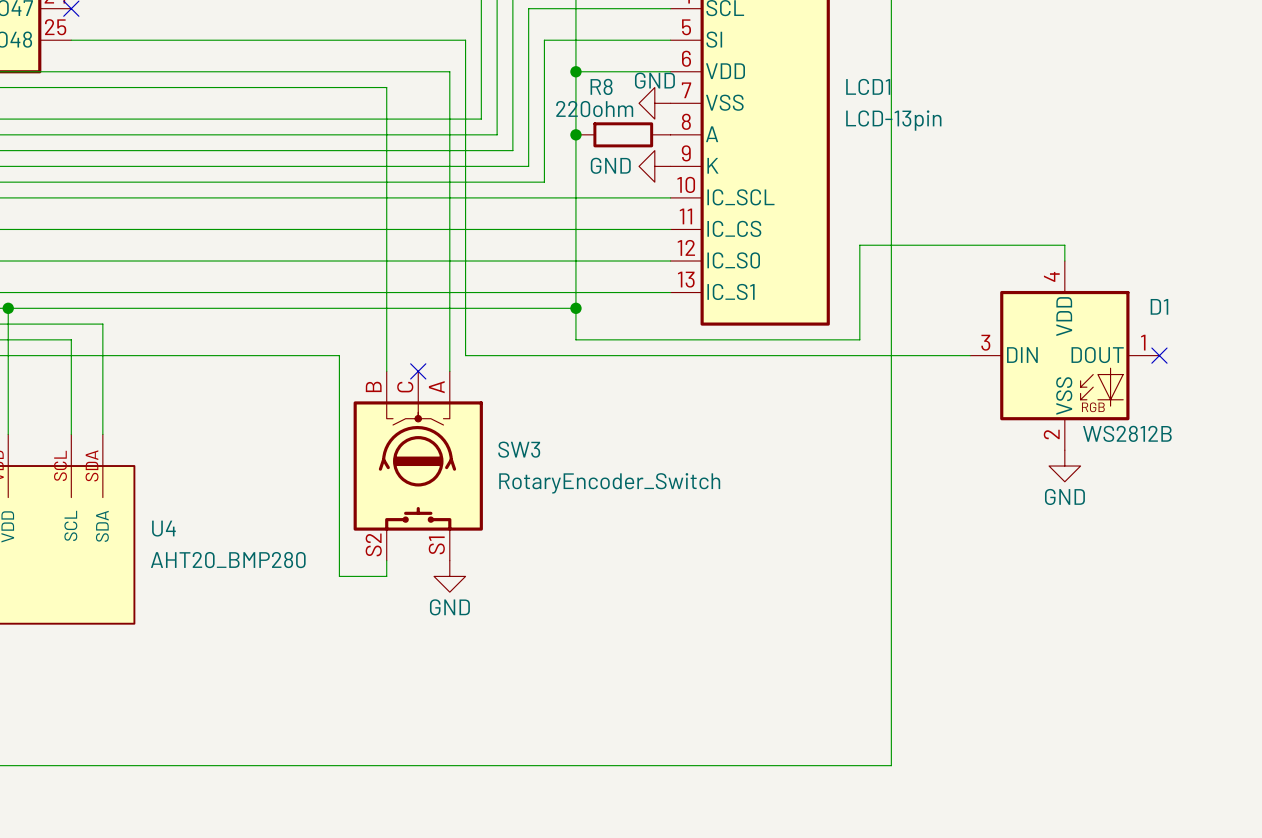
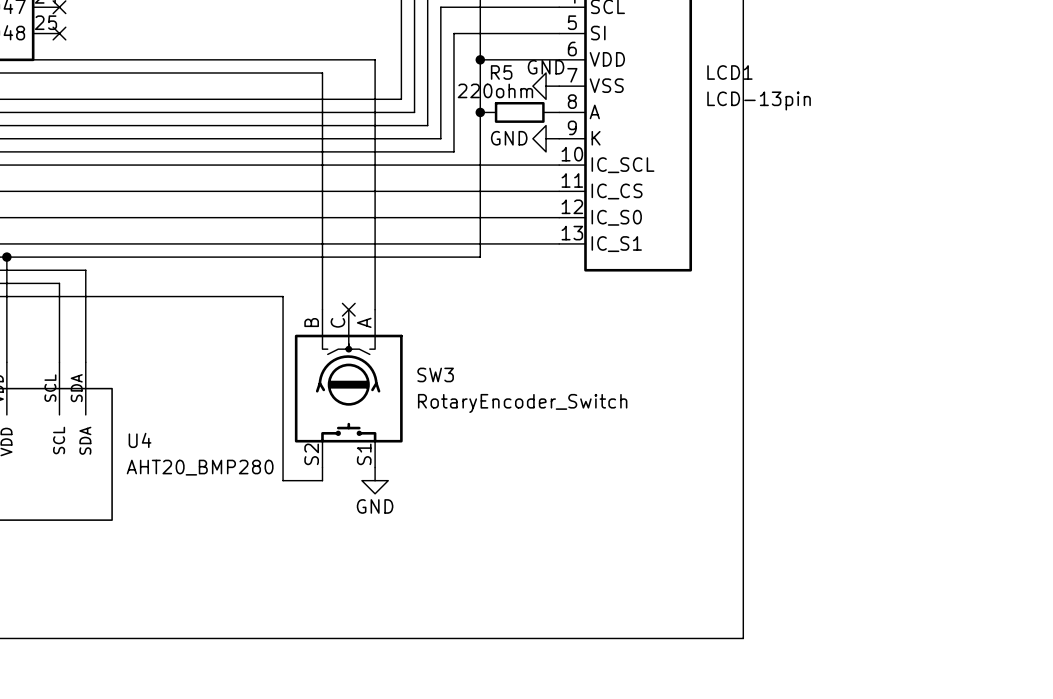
wire: (71, 40) (465, 40) (465, 355) (970, 355) -> none
no-connect mark: none -> (59, 33)
R8 name: R8 (601, 86) -> R5 (501, 72)
wire: (1064, 261) (1064, 245) (859, 245) (859, 339) (575, 339) (575, 308) -> none
junction: (575, 308) -> none
D1: WS2812B (1064, 355) -> none
no-connect mark: (1159, 355) -> none
power symbol: GND (1064, 466) -> none

